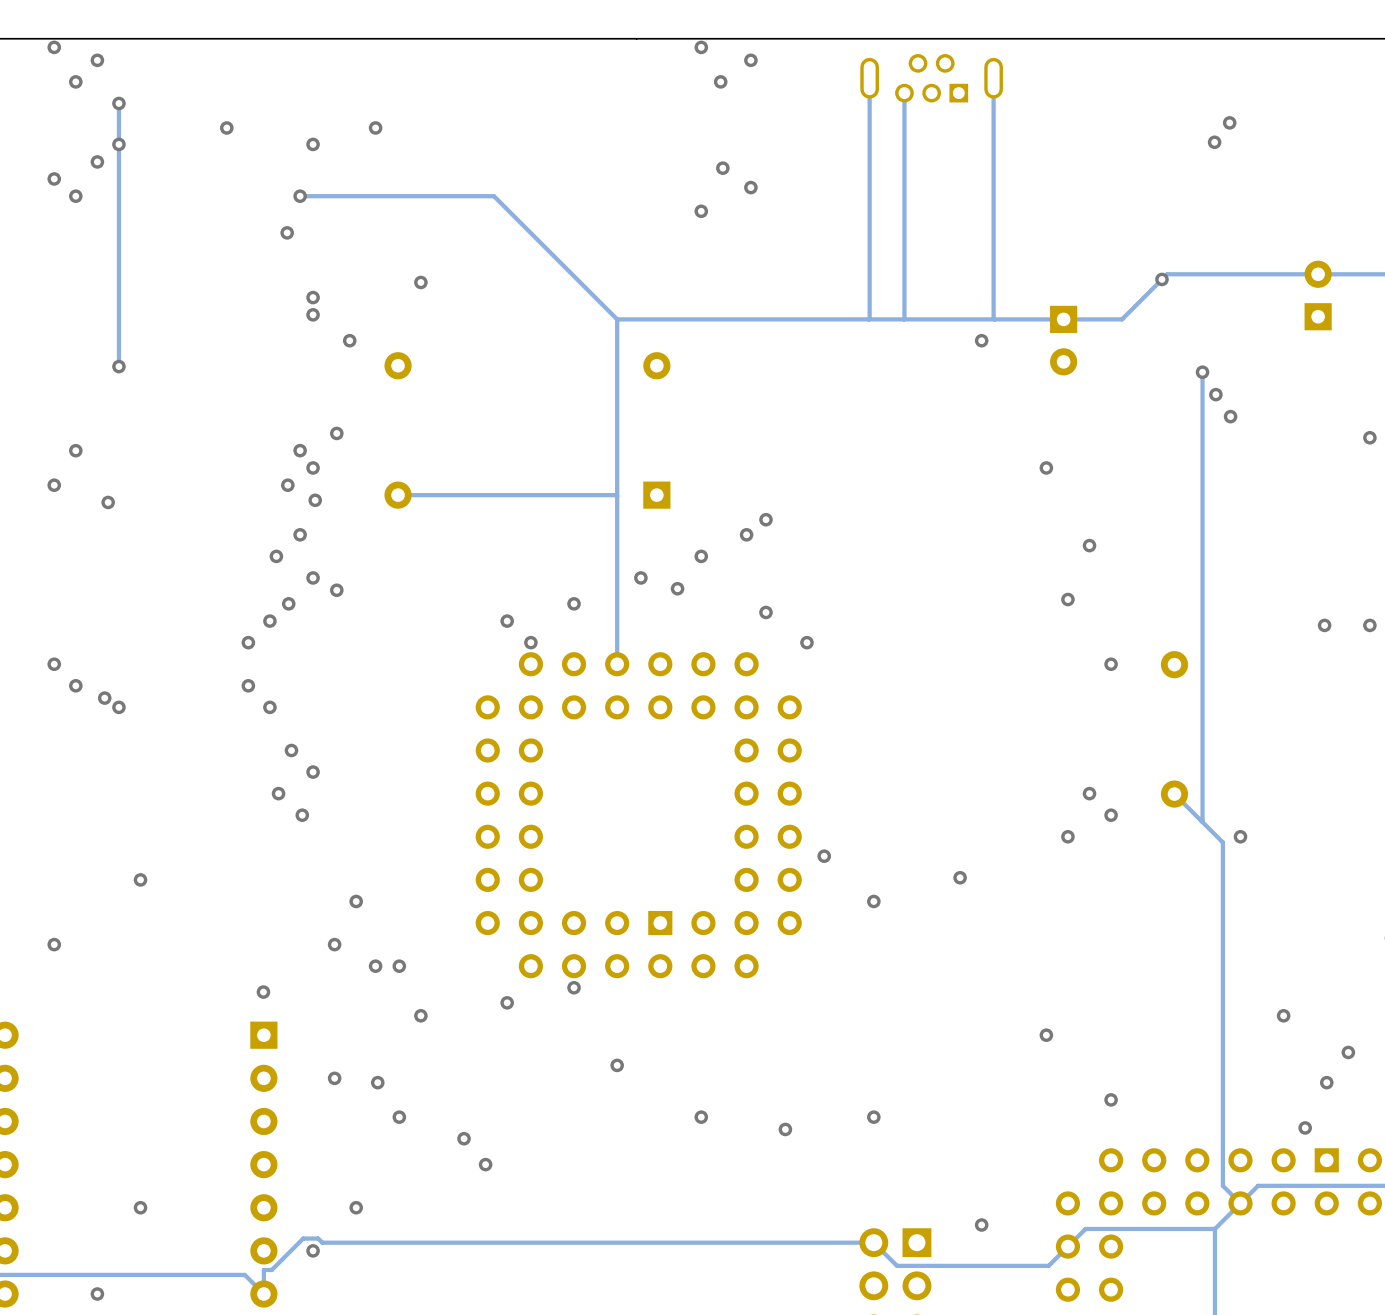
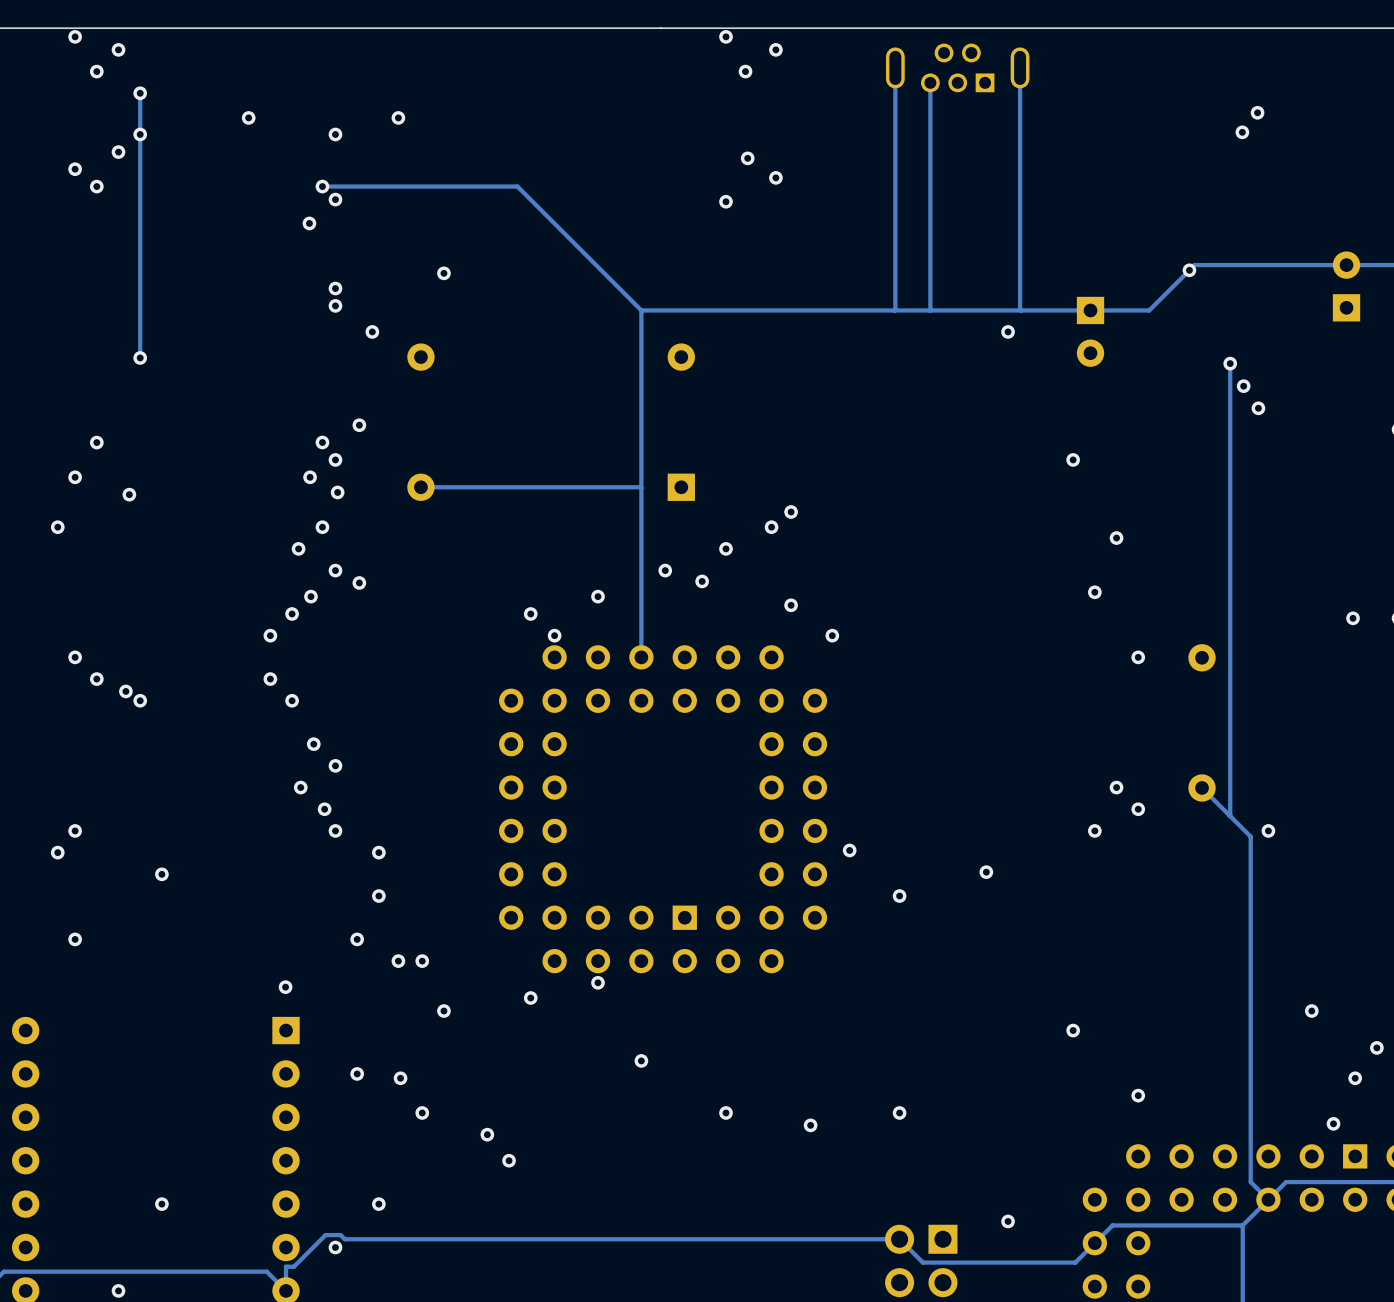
via: none -> (335, 199)
via: none -> (57, 527)
via: none -> (75, 830)
via: none -> (335, 830)
via: none -> (57, 852)
via: none -> (378, 852)

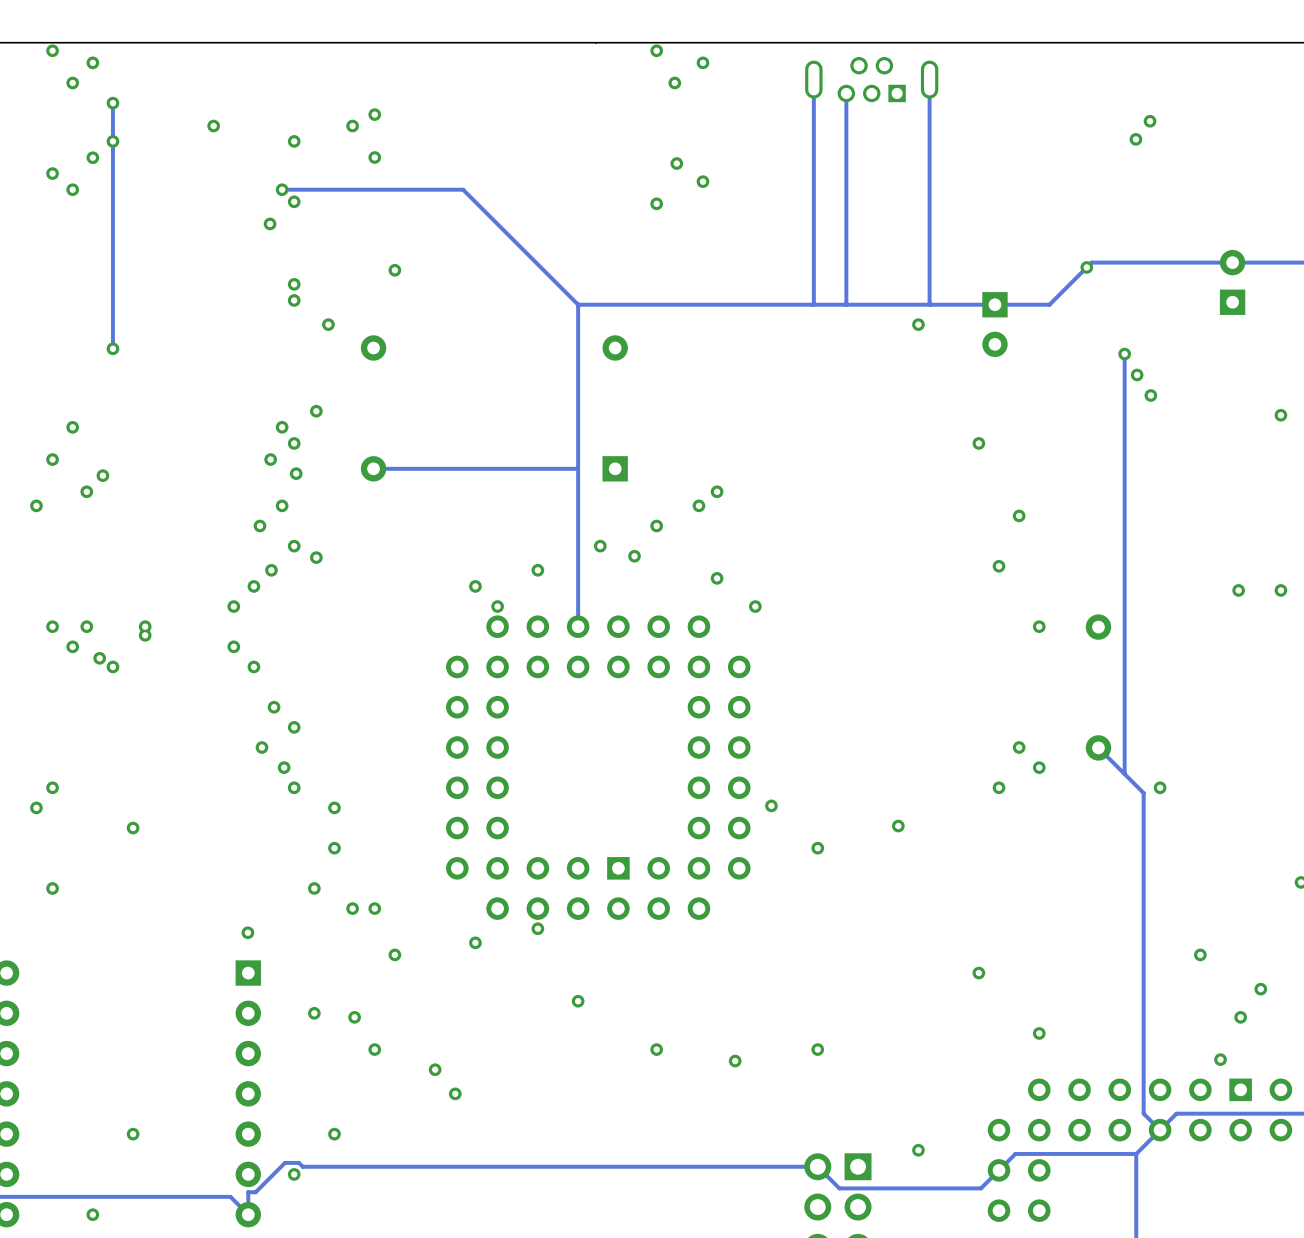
via: none -> (374, 114)
via: none -> (374, 157)
via: none -> (86, 491)
via: none -> (86, 626)
via: none -> (145, 626)
via: none -> (145, 635)

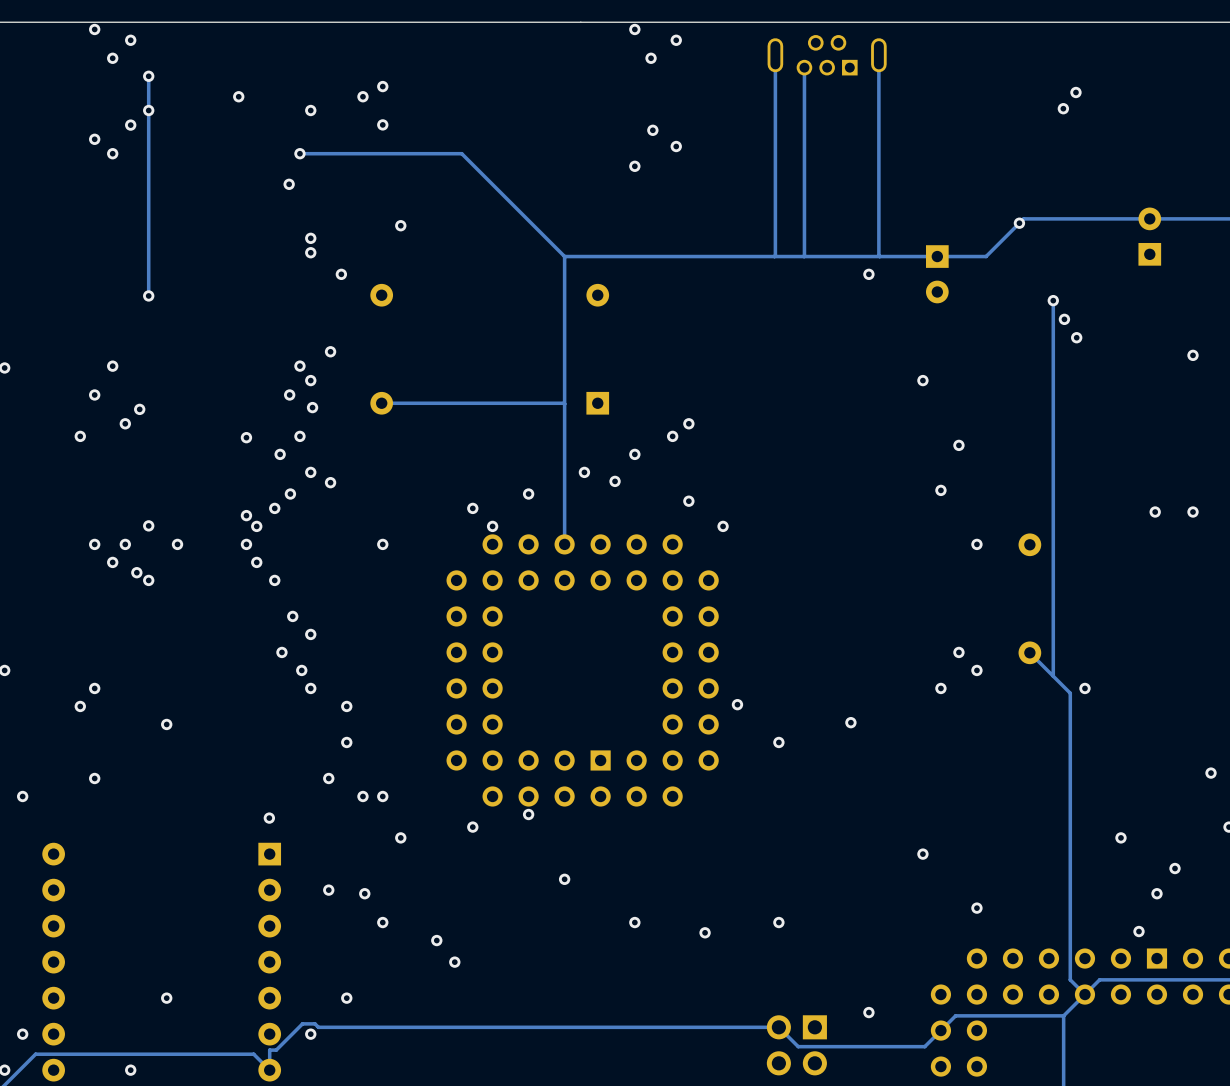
via: (294, 201) -> none
via: none -> (246, 437)
via: none -> (246, 515)
via: none -> (148, 525)
via: none -> (246, 544)
via: none -> (382, 544)
via: (145, 635) -> none

